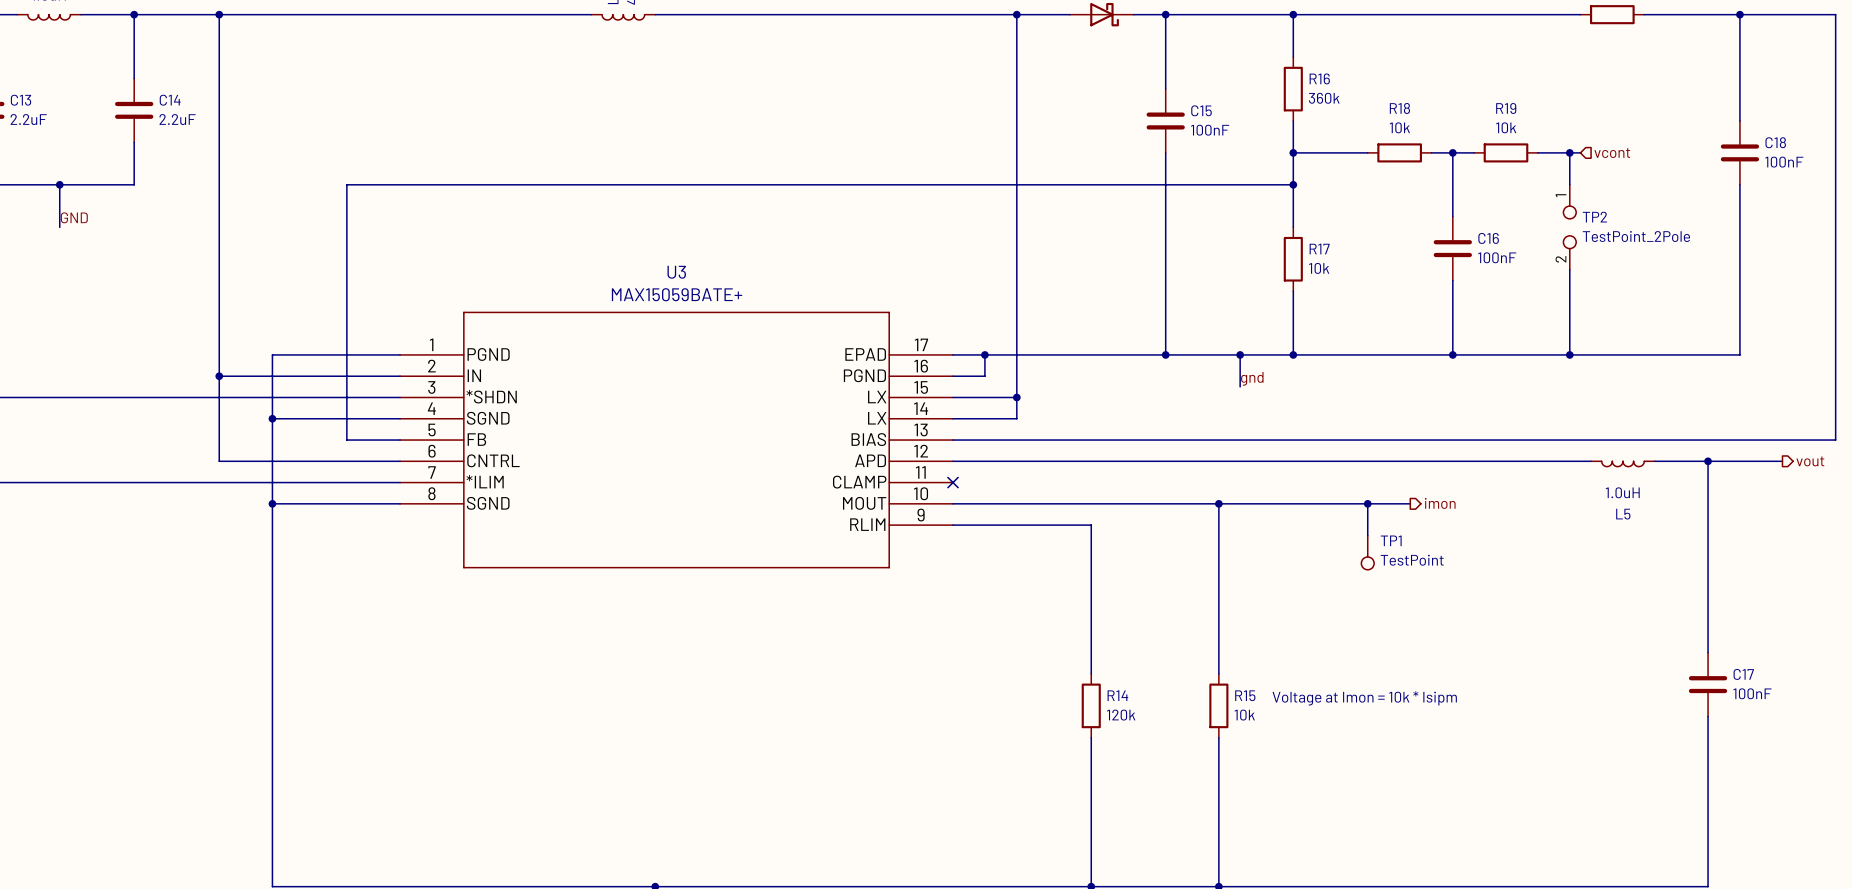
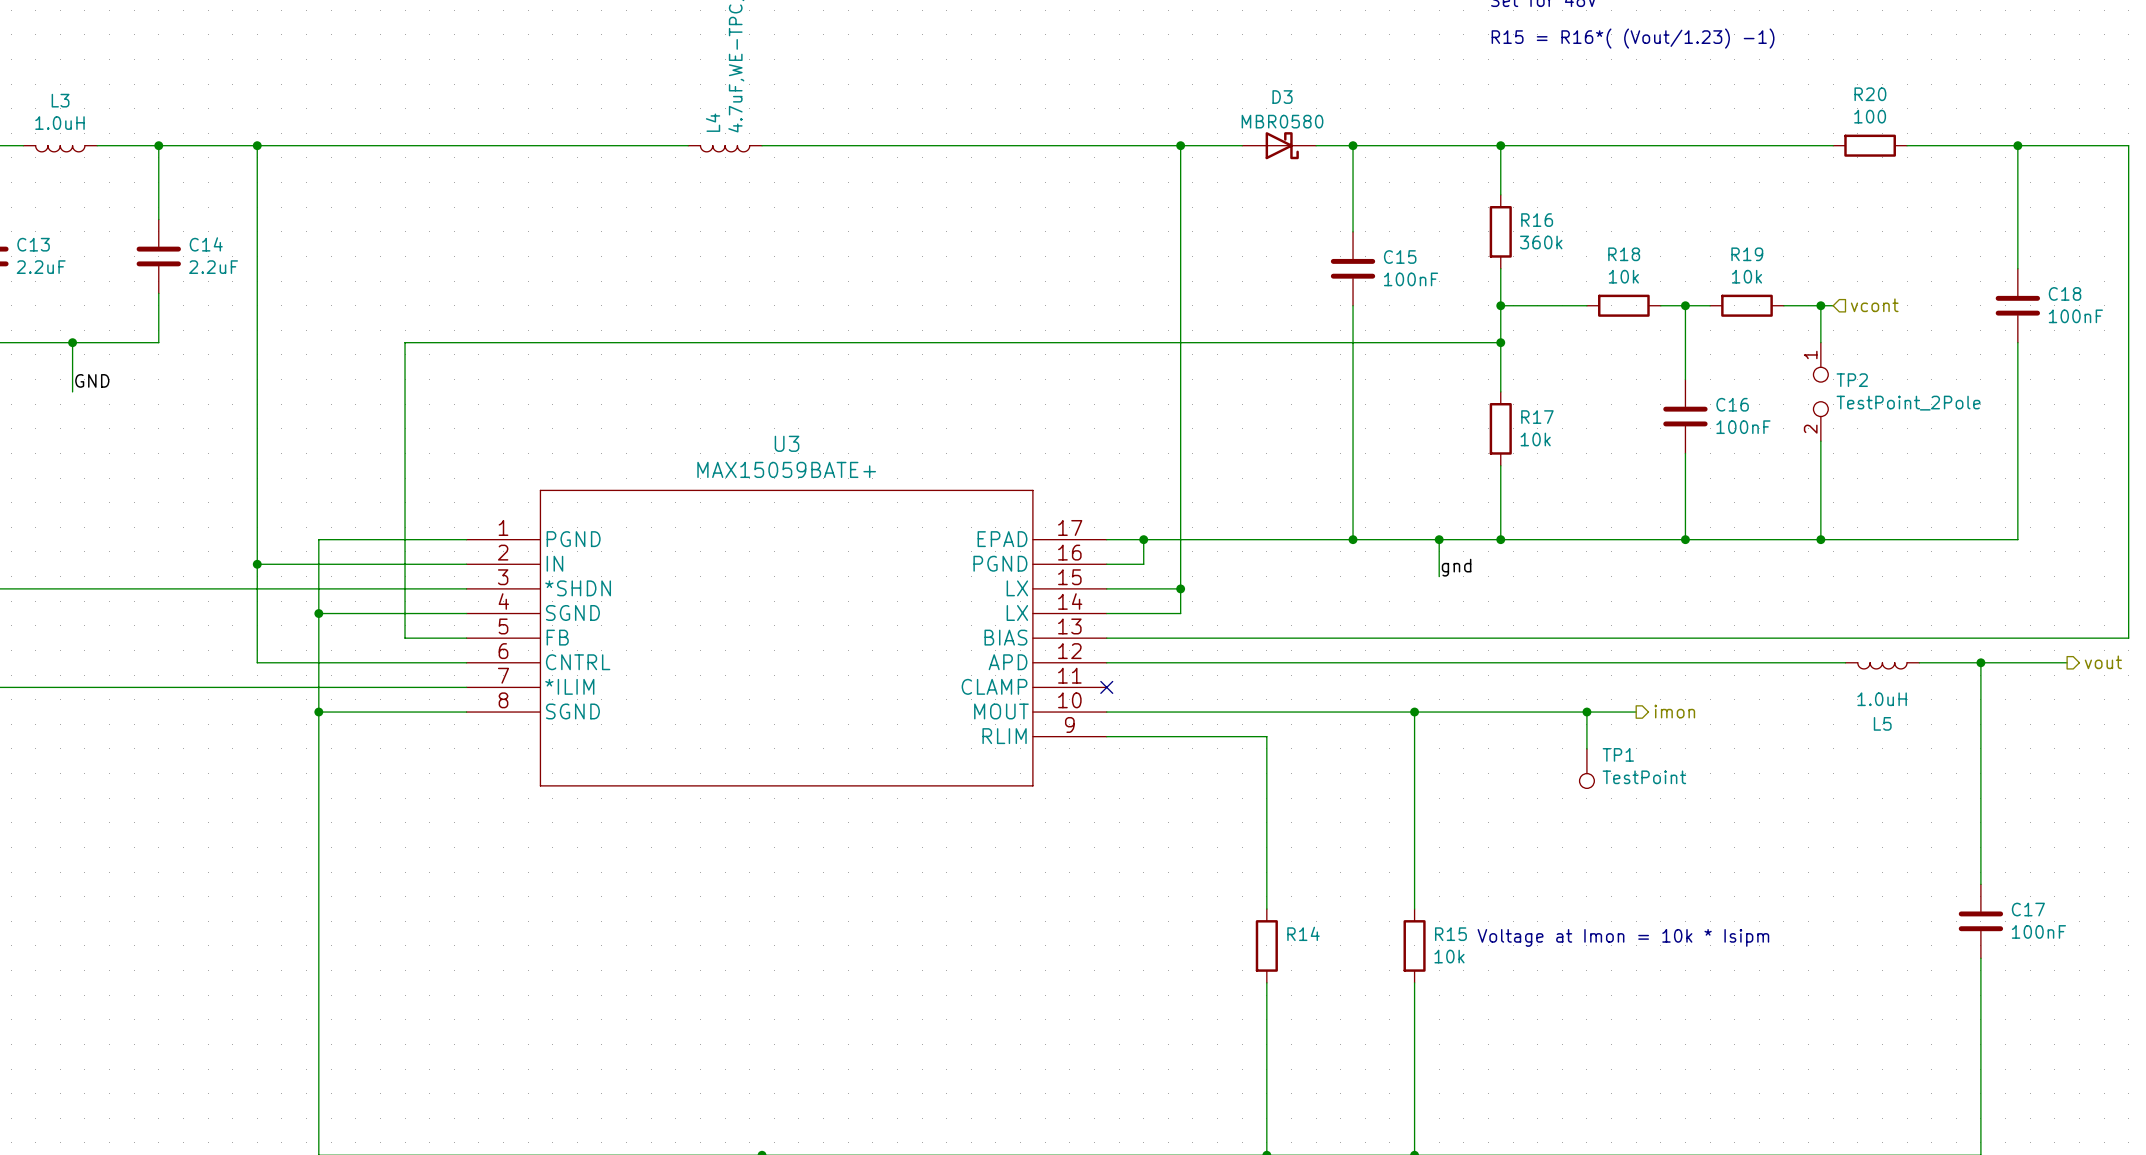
R14 value: 120k (1121, 715) -> none

